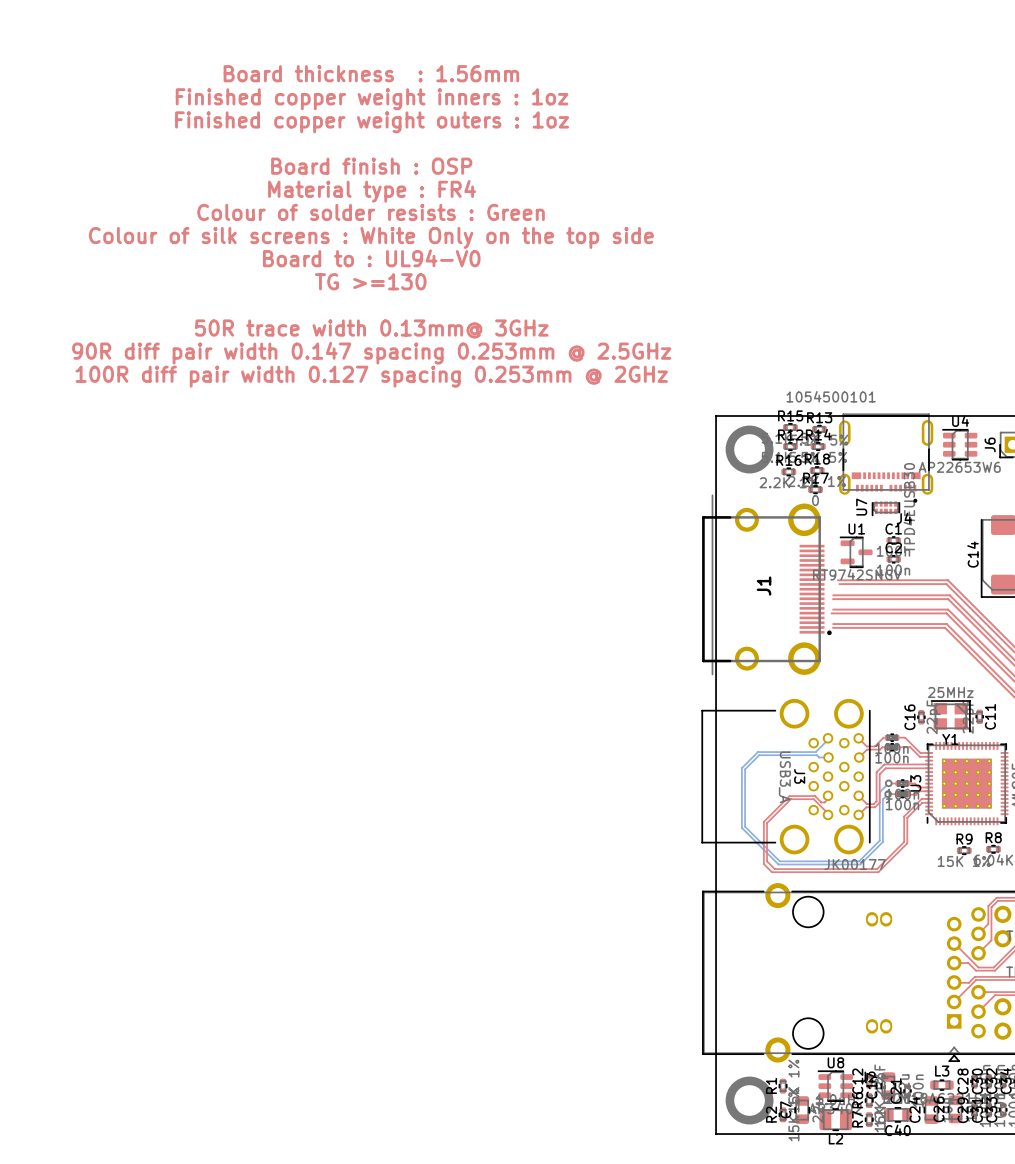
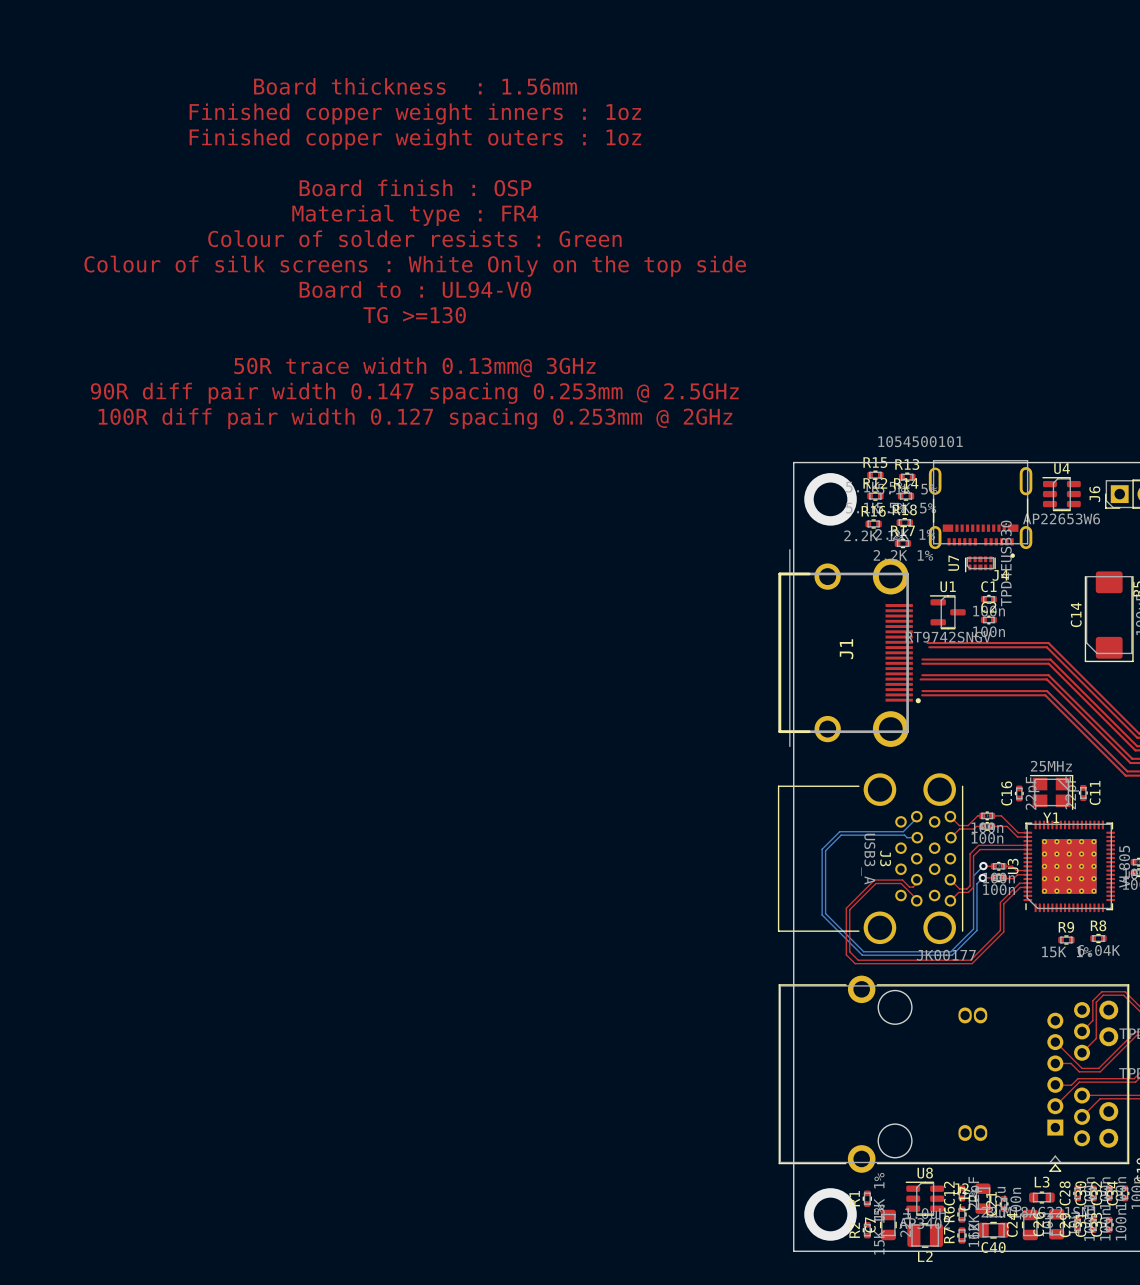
R17 value: 0 (815, 500) -> 2.2K 1% (903, 555)

